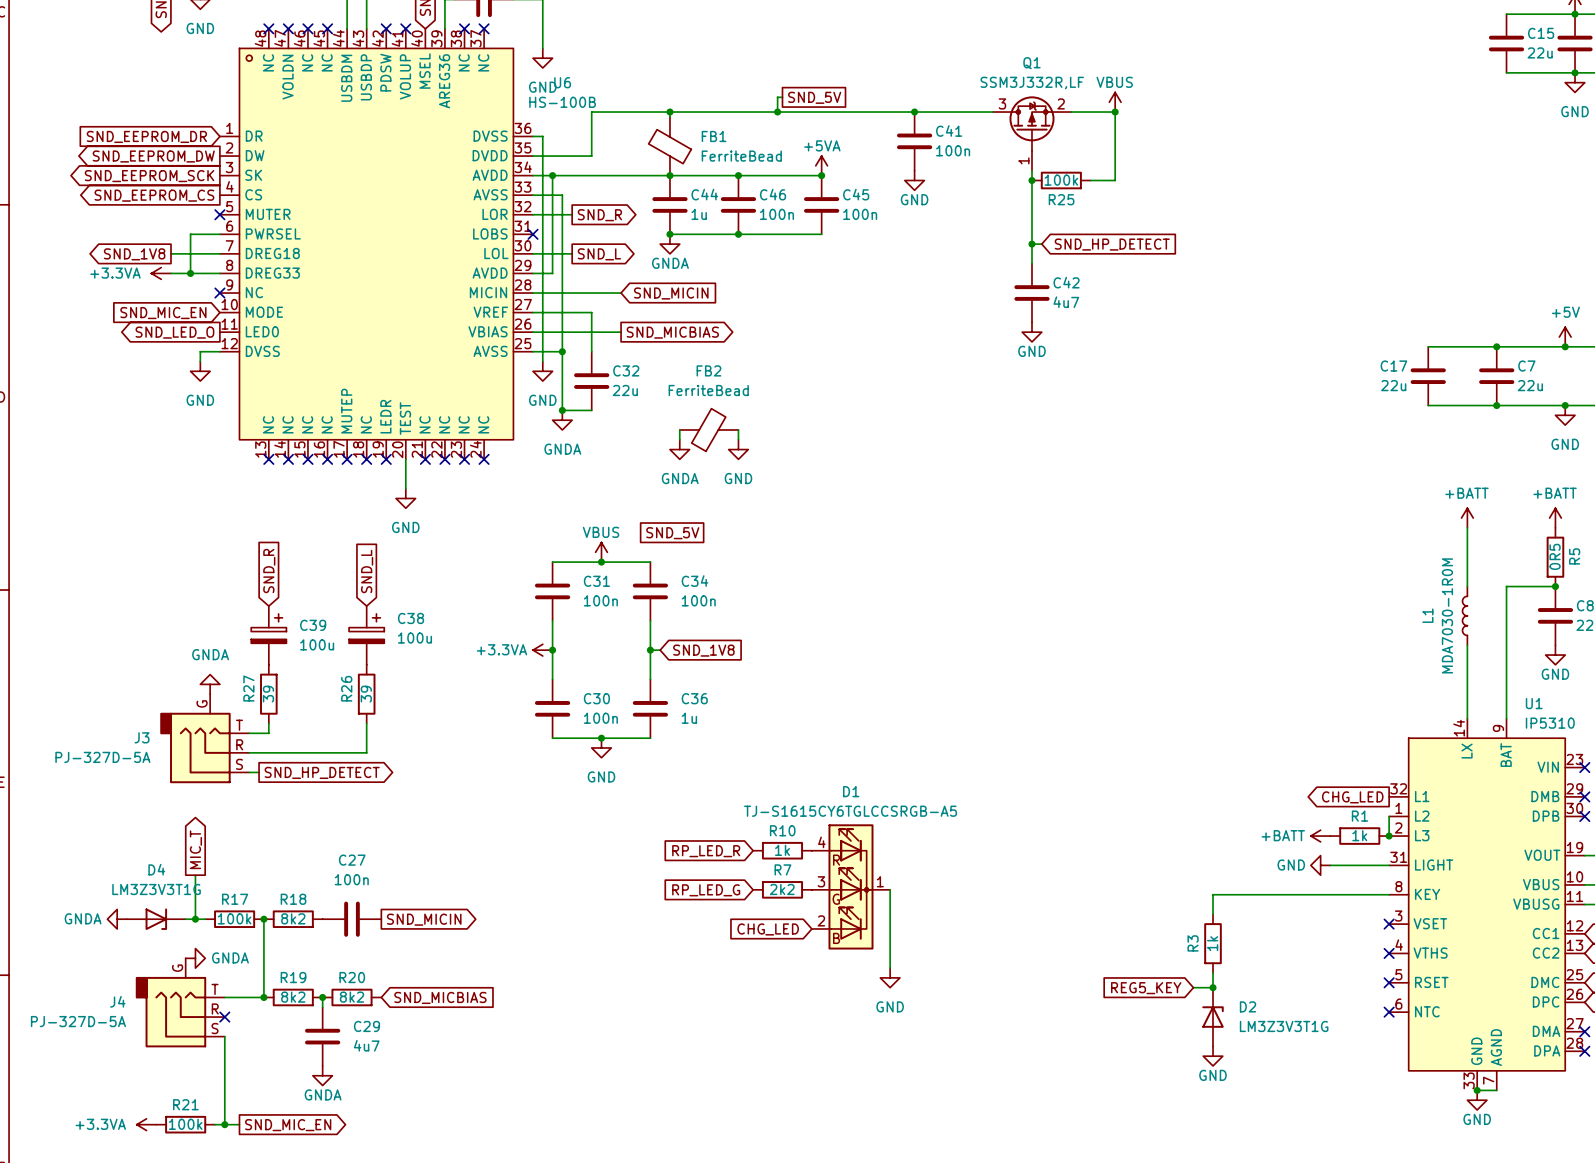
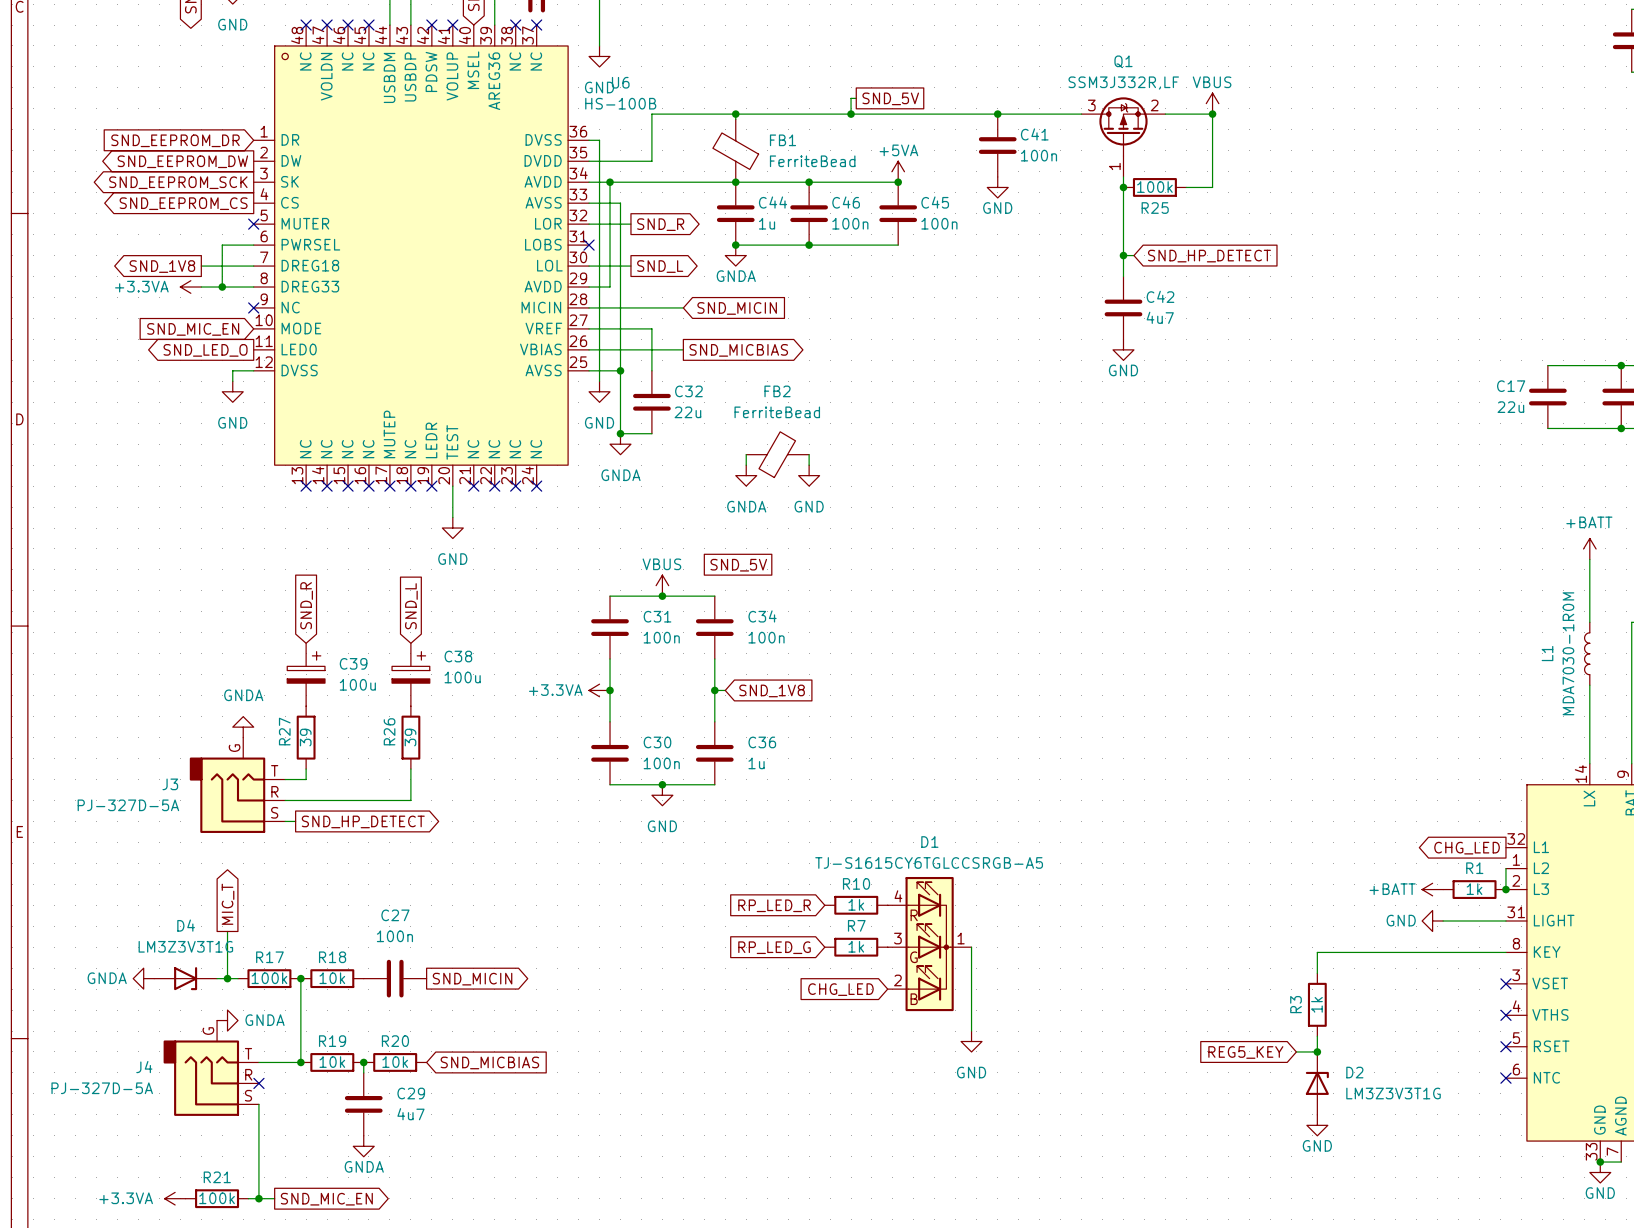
R7 value: 2k2 (782, 889) -> 1k (856, 946)
R18 value: 8k2 (293, 918) -> 10k (332, 978)
R19 value: 8k2 (293, 997) -> 10k (332, 1062)
R20 value: 8k2 (351, 997) -> 10k (395, 1062)

